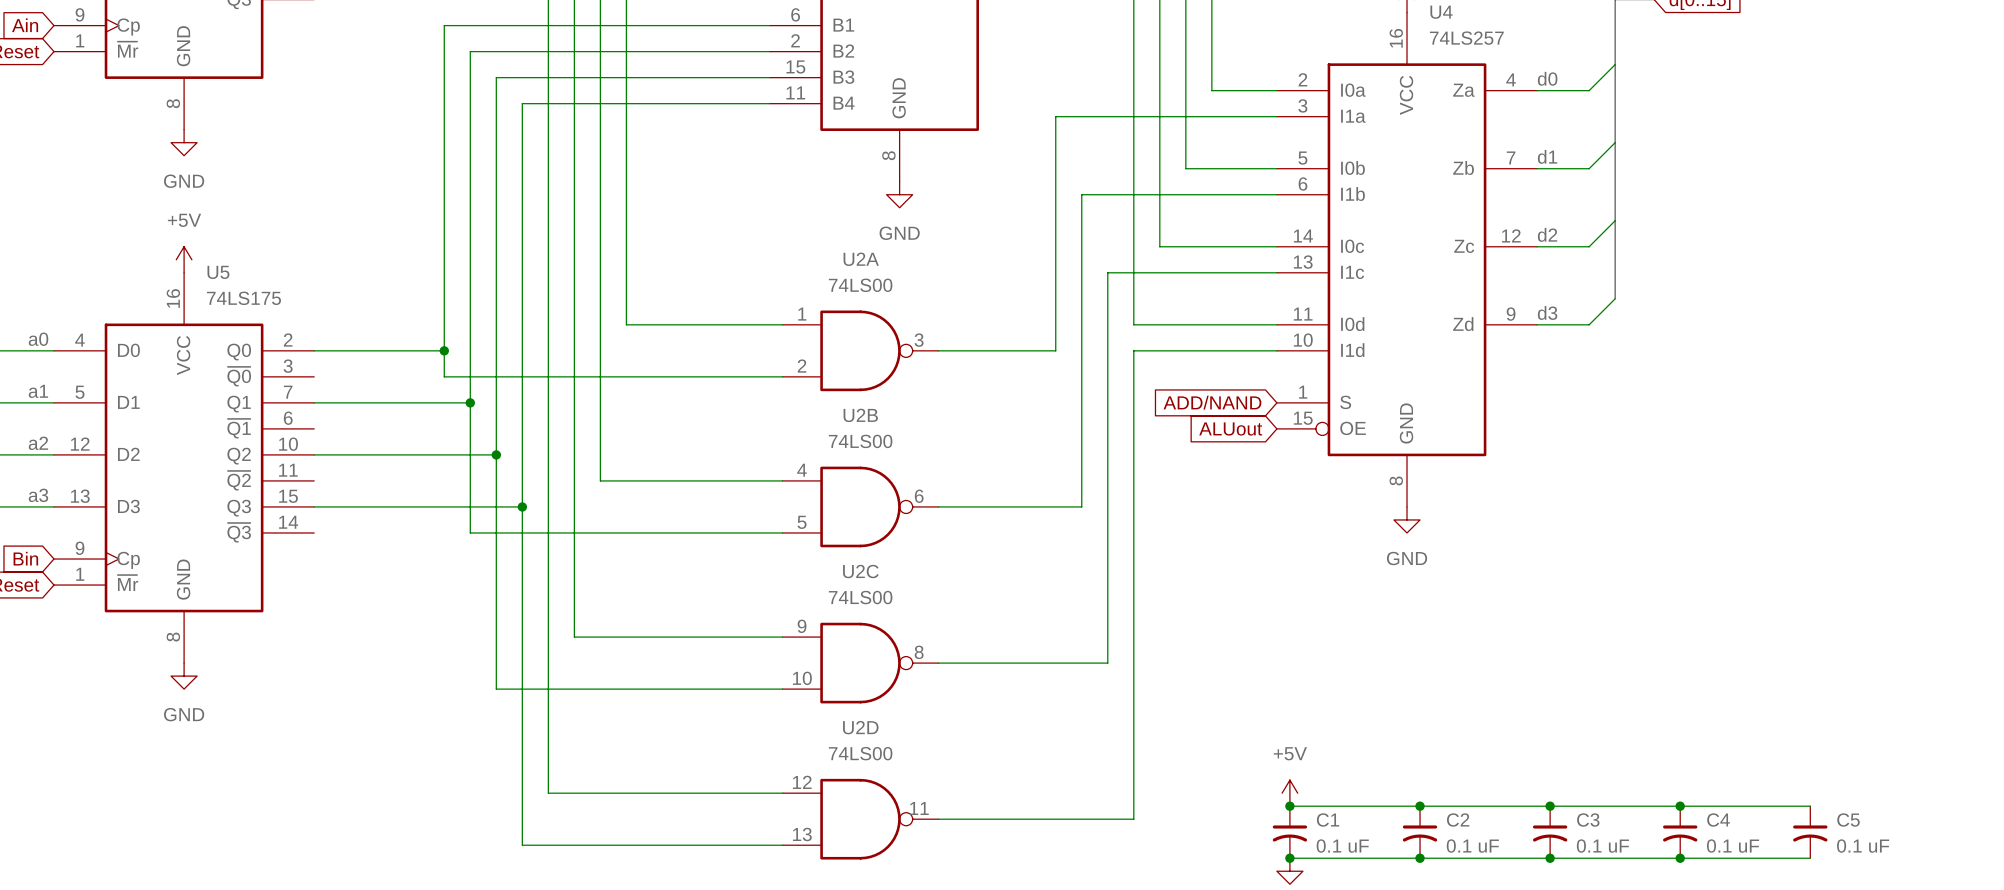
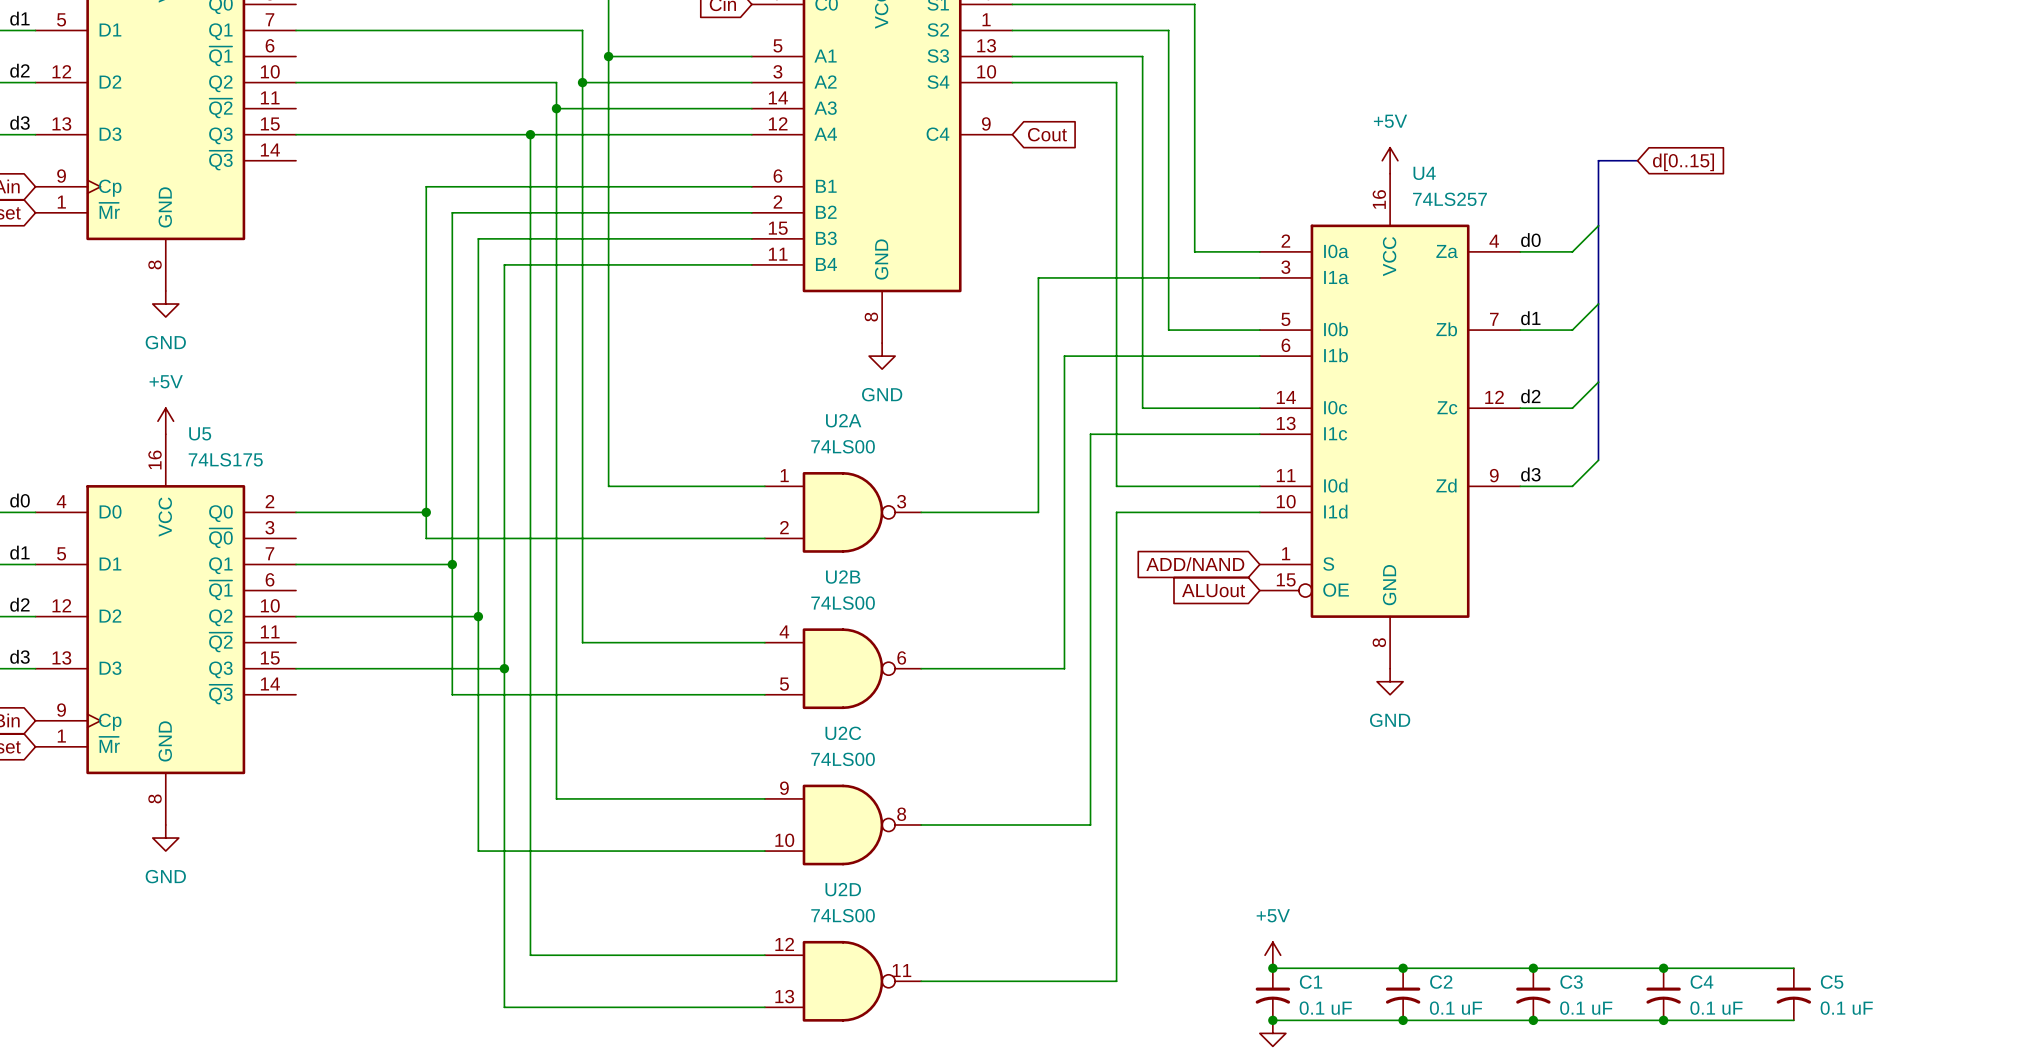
label: a0 (38, 339) -> d0 (20, 500)
label: a1 (38, 391) -> d1 (19, 552)
label: a2 (38, 443) -> d2 (19, 604)
label: a3 (38, 495) -> d3 (19, 656)

